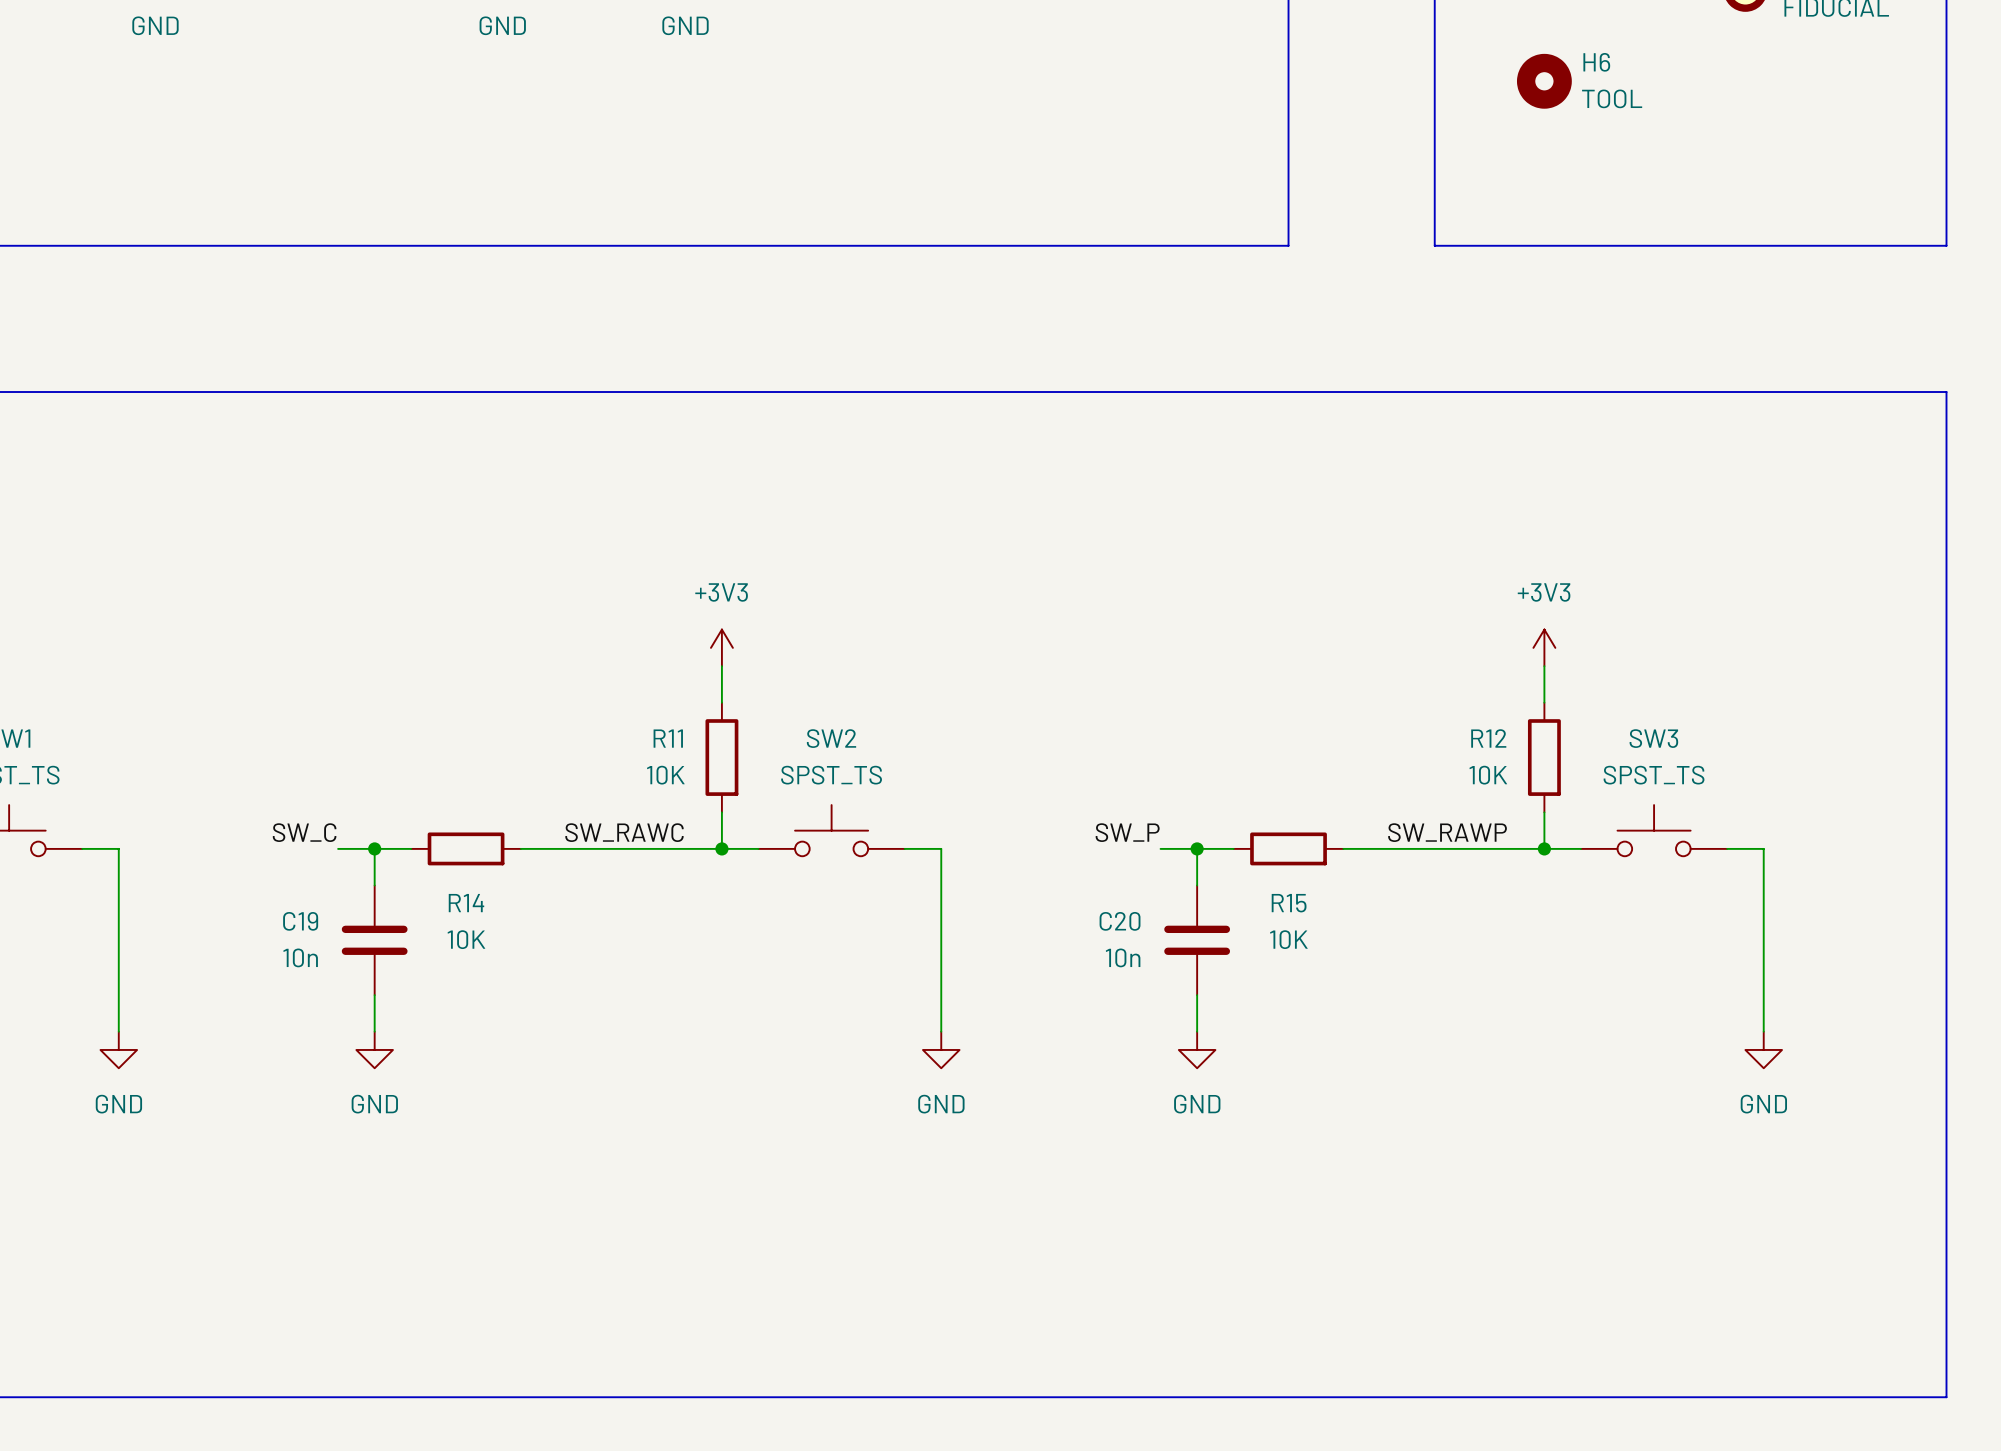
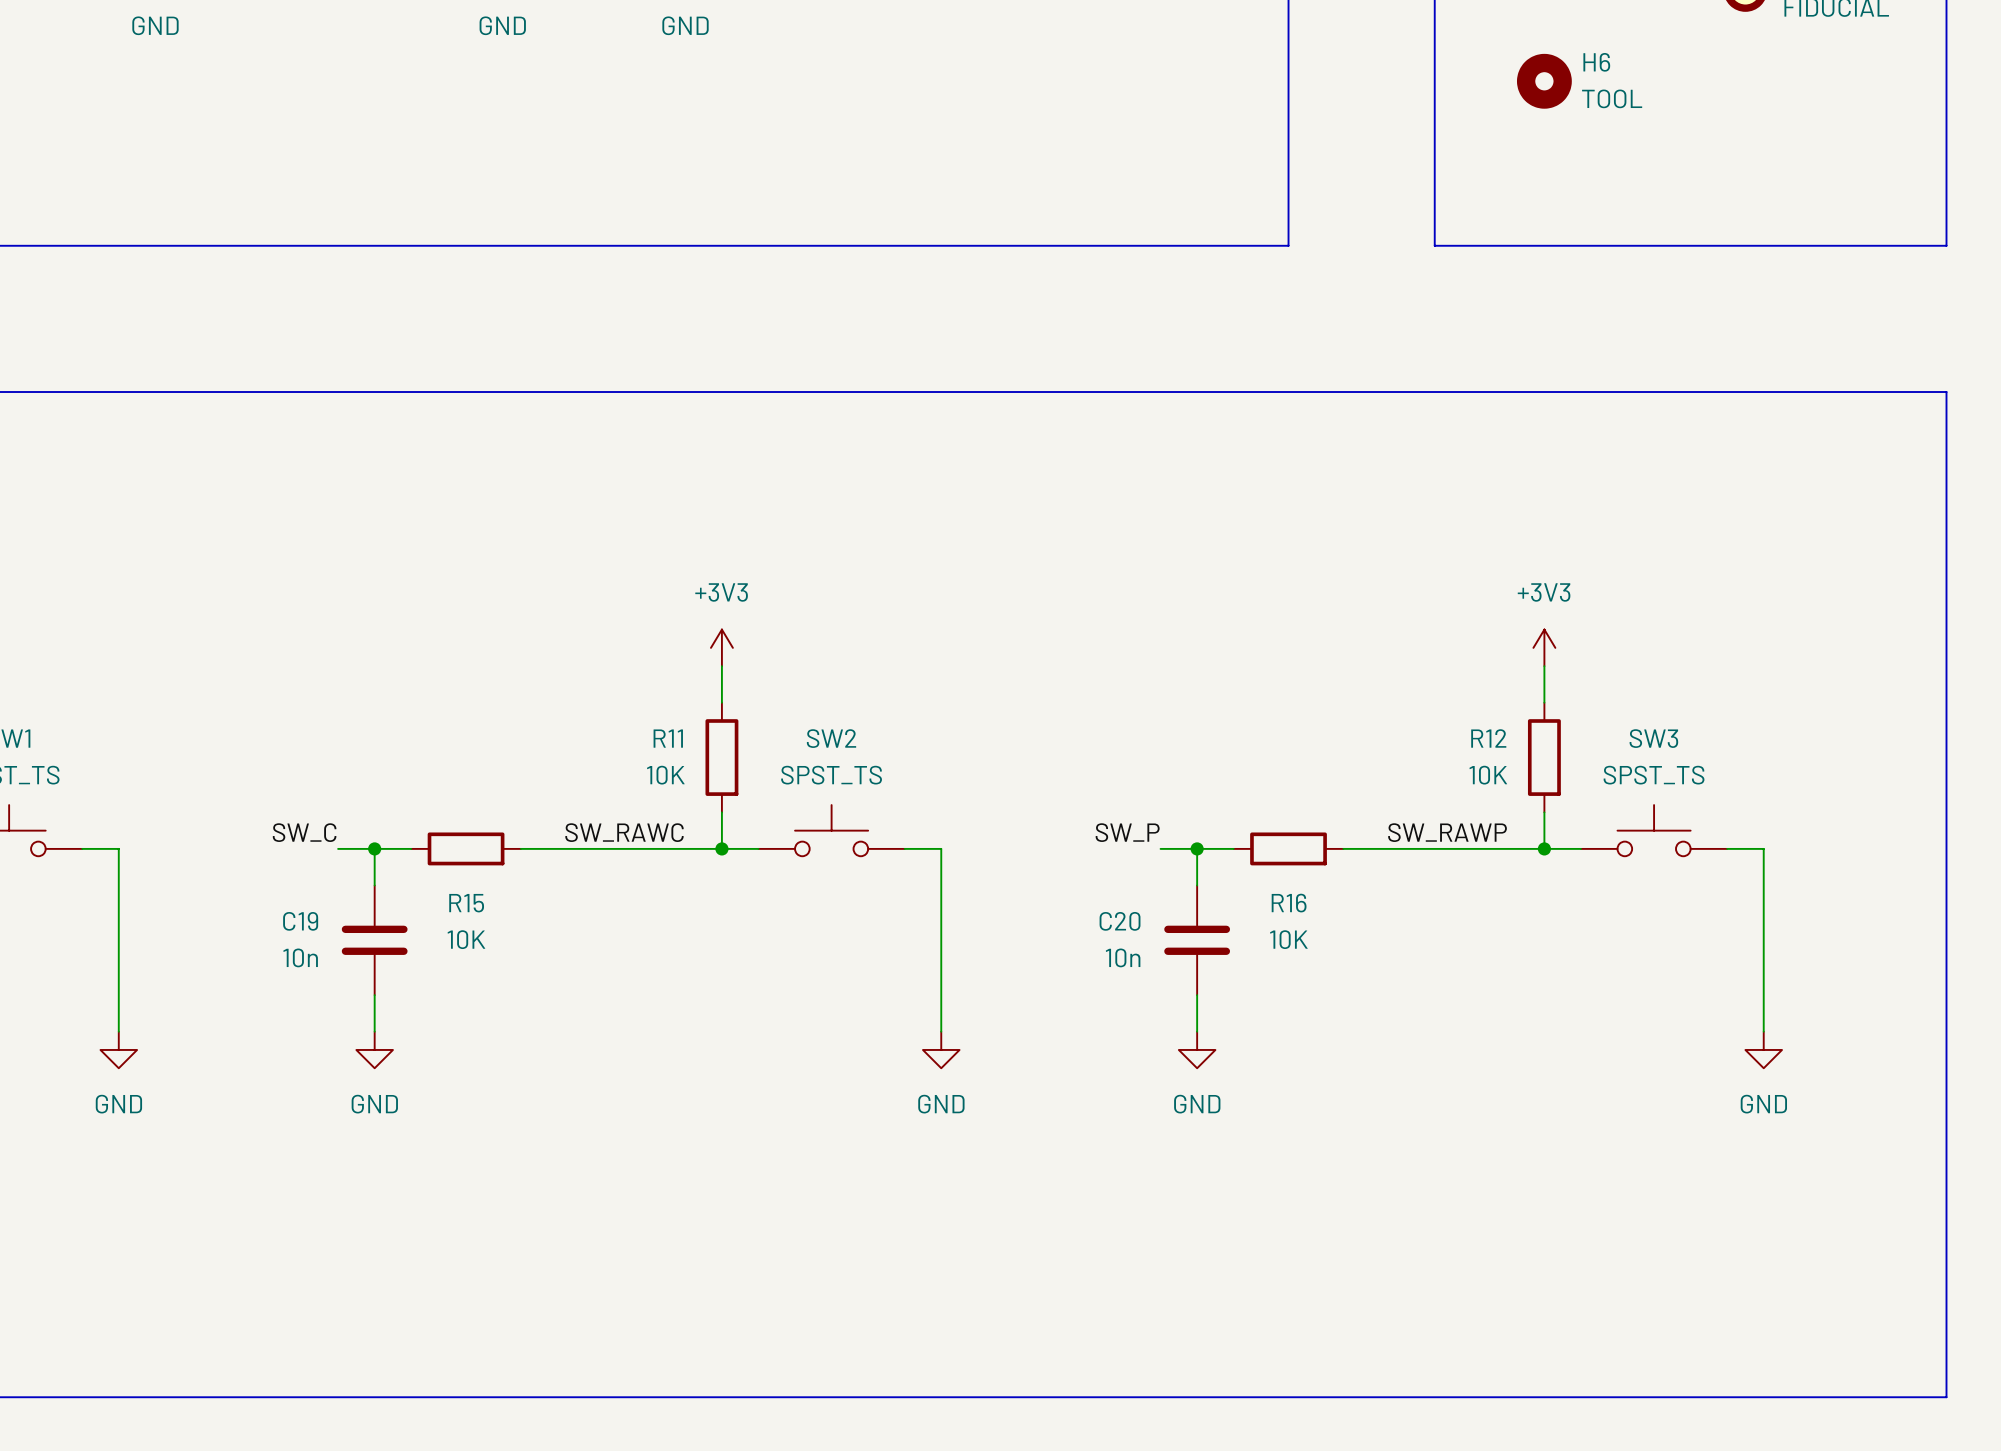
R14 name: R14 (466, 903) -> R15 (466, 903)
R15 name: R15 (1289, 903) -> R16 (1289, 903)

